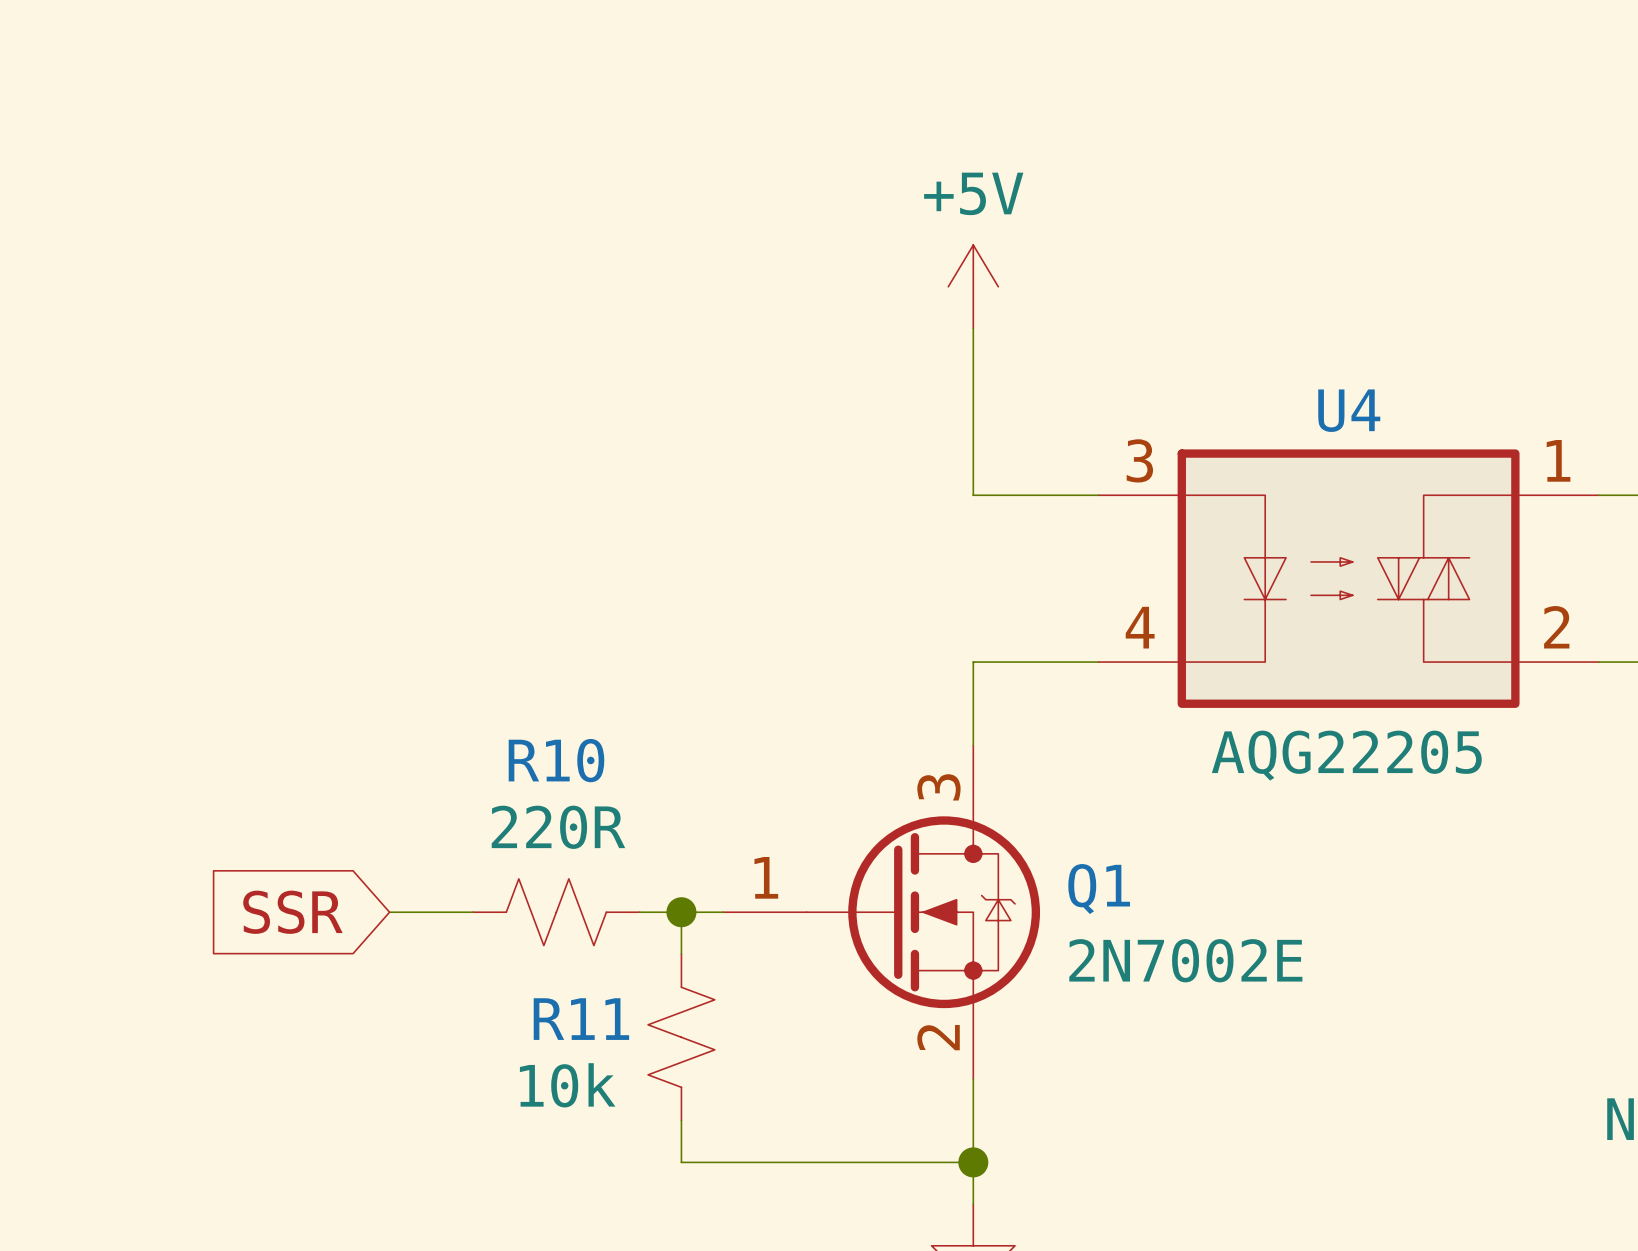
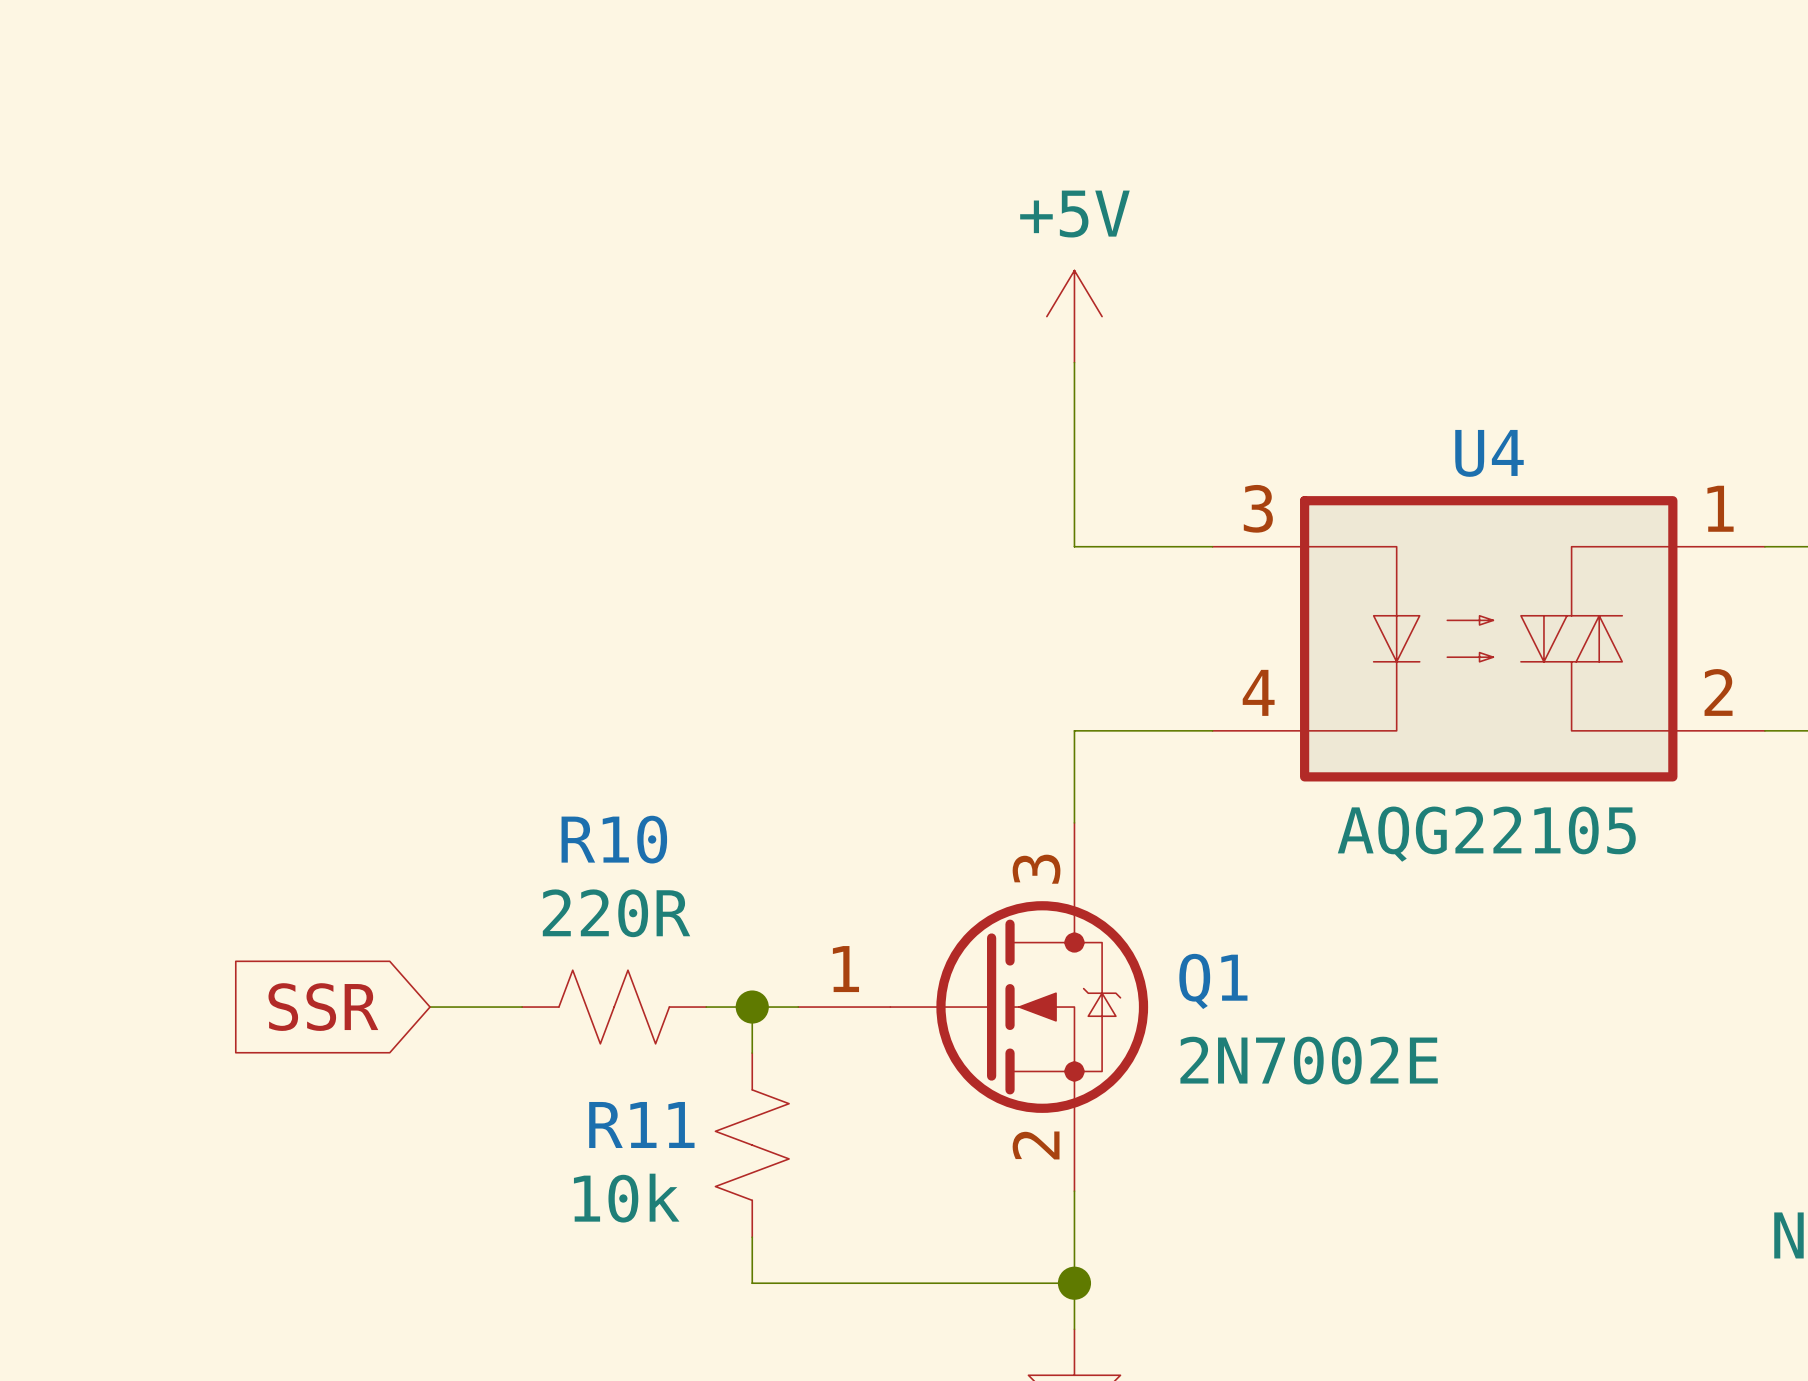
U4 value: AQG22205 (1346, 755) -> AQG22105 (1486, 834)

